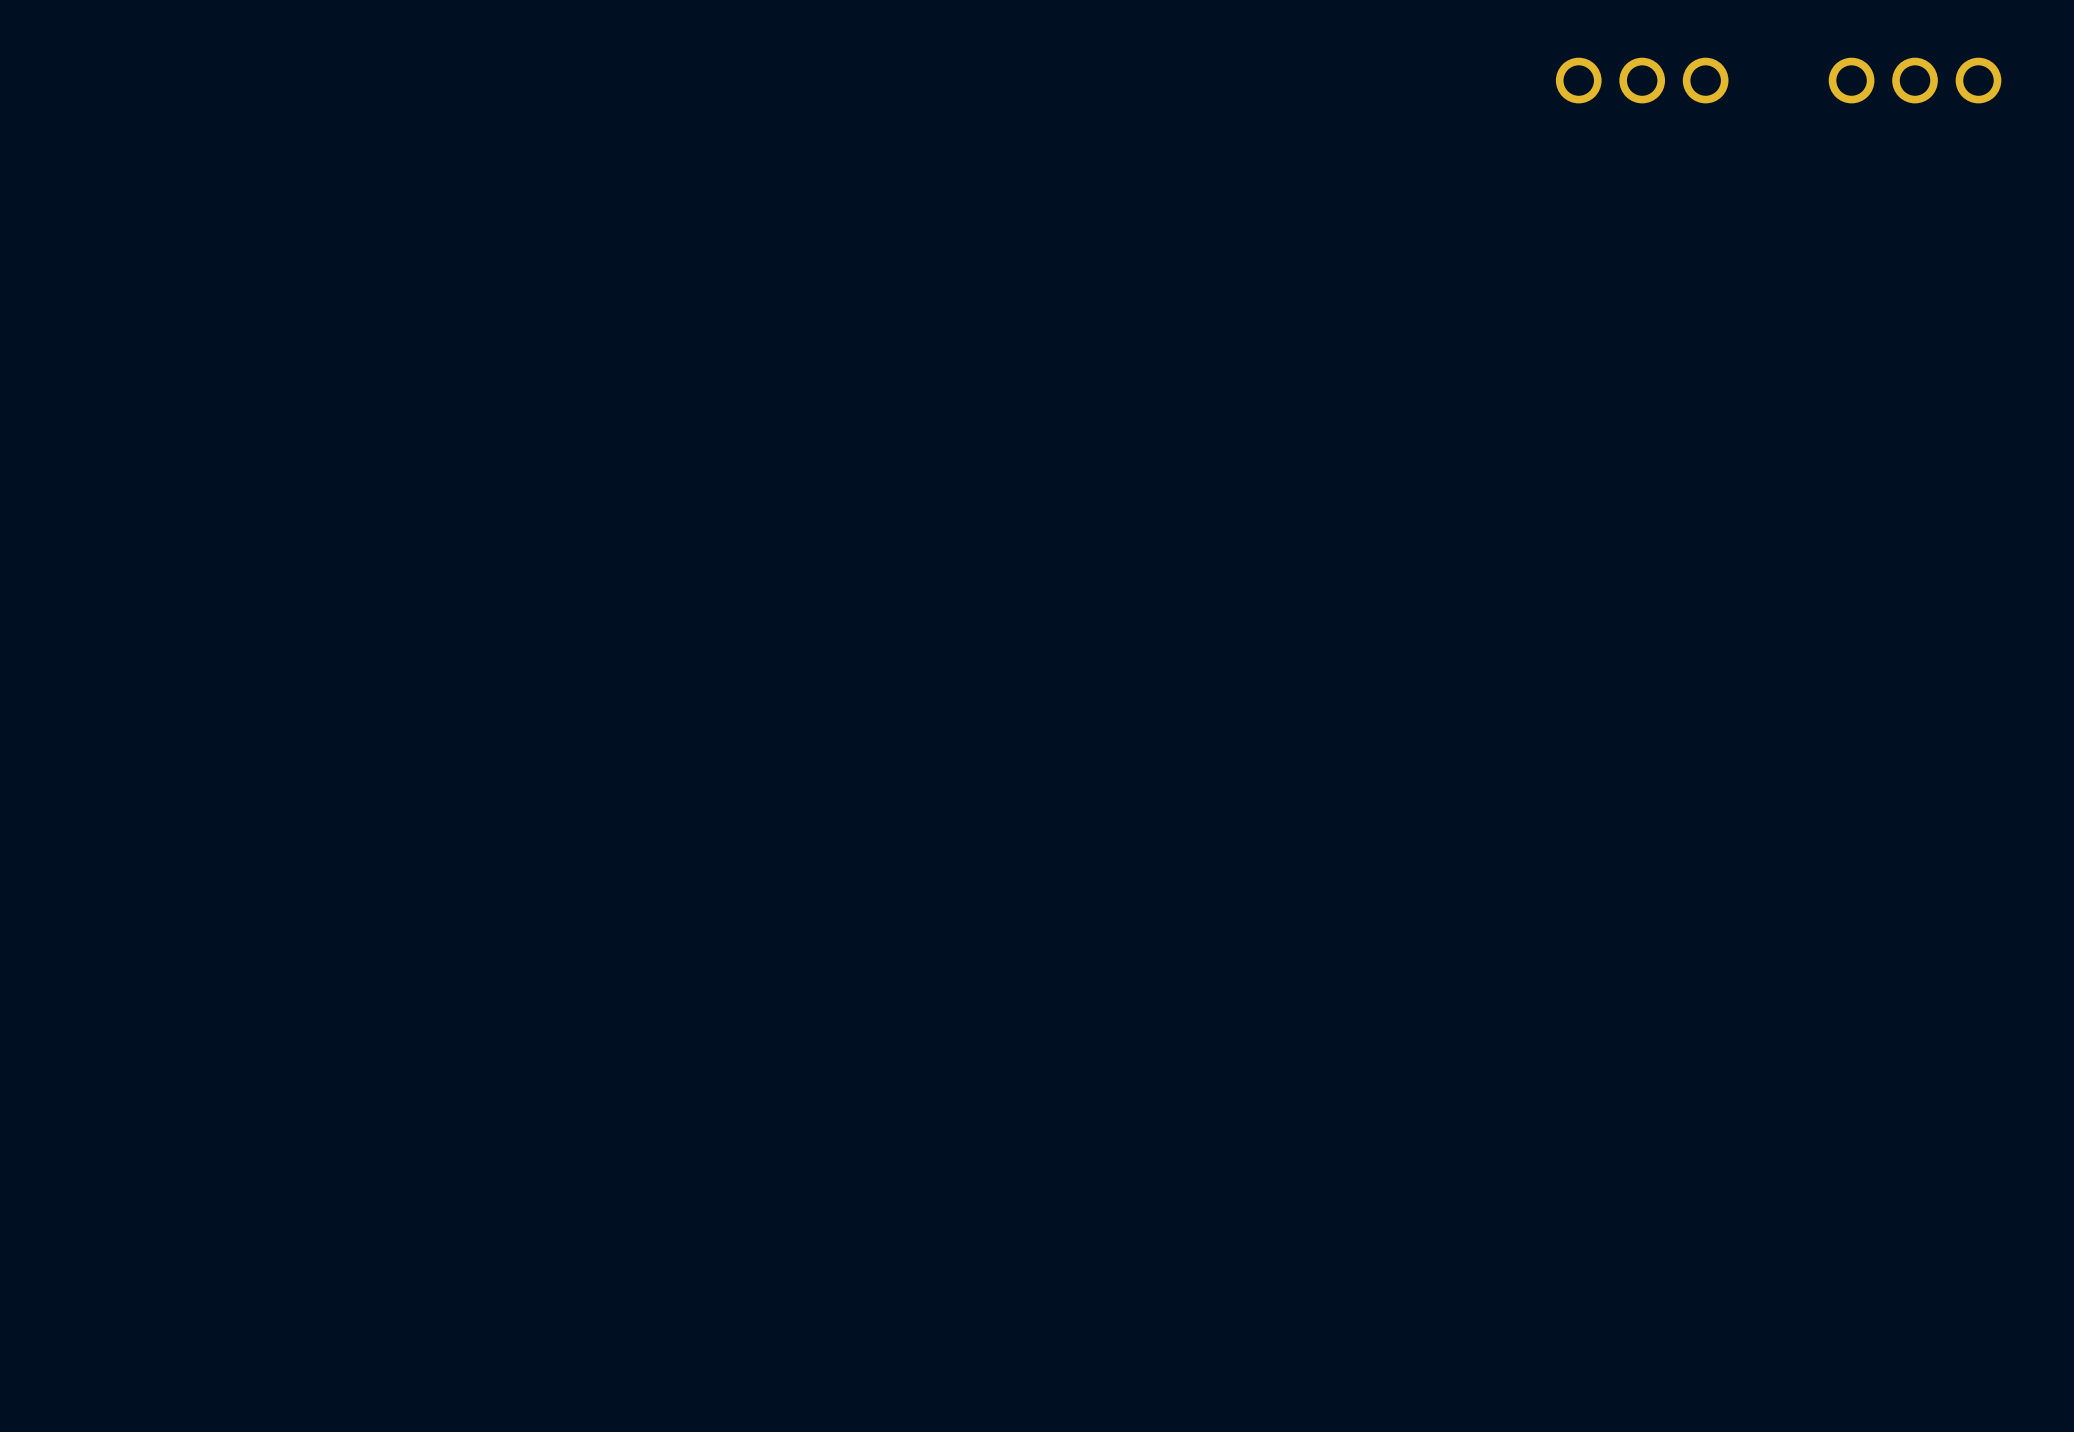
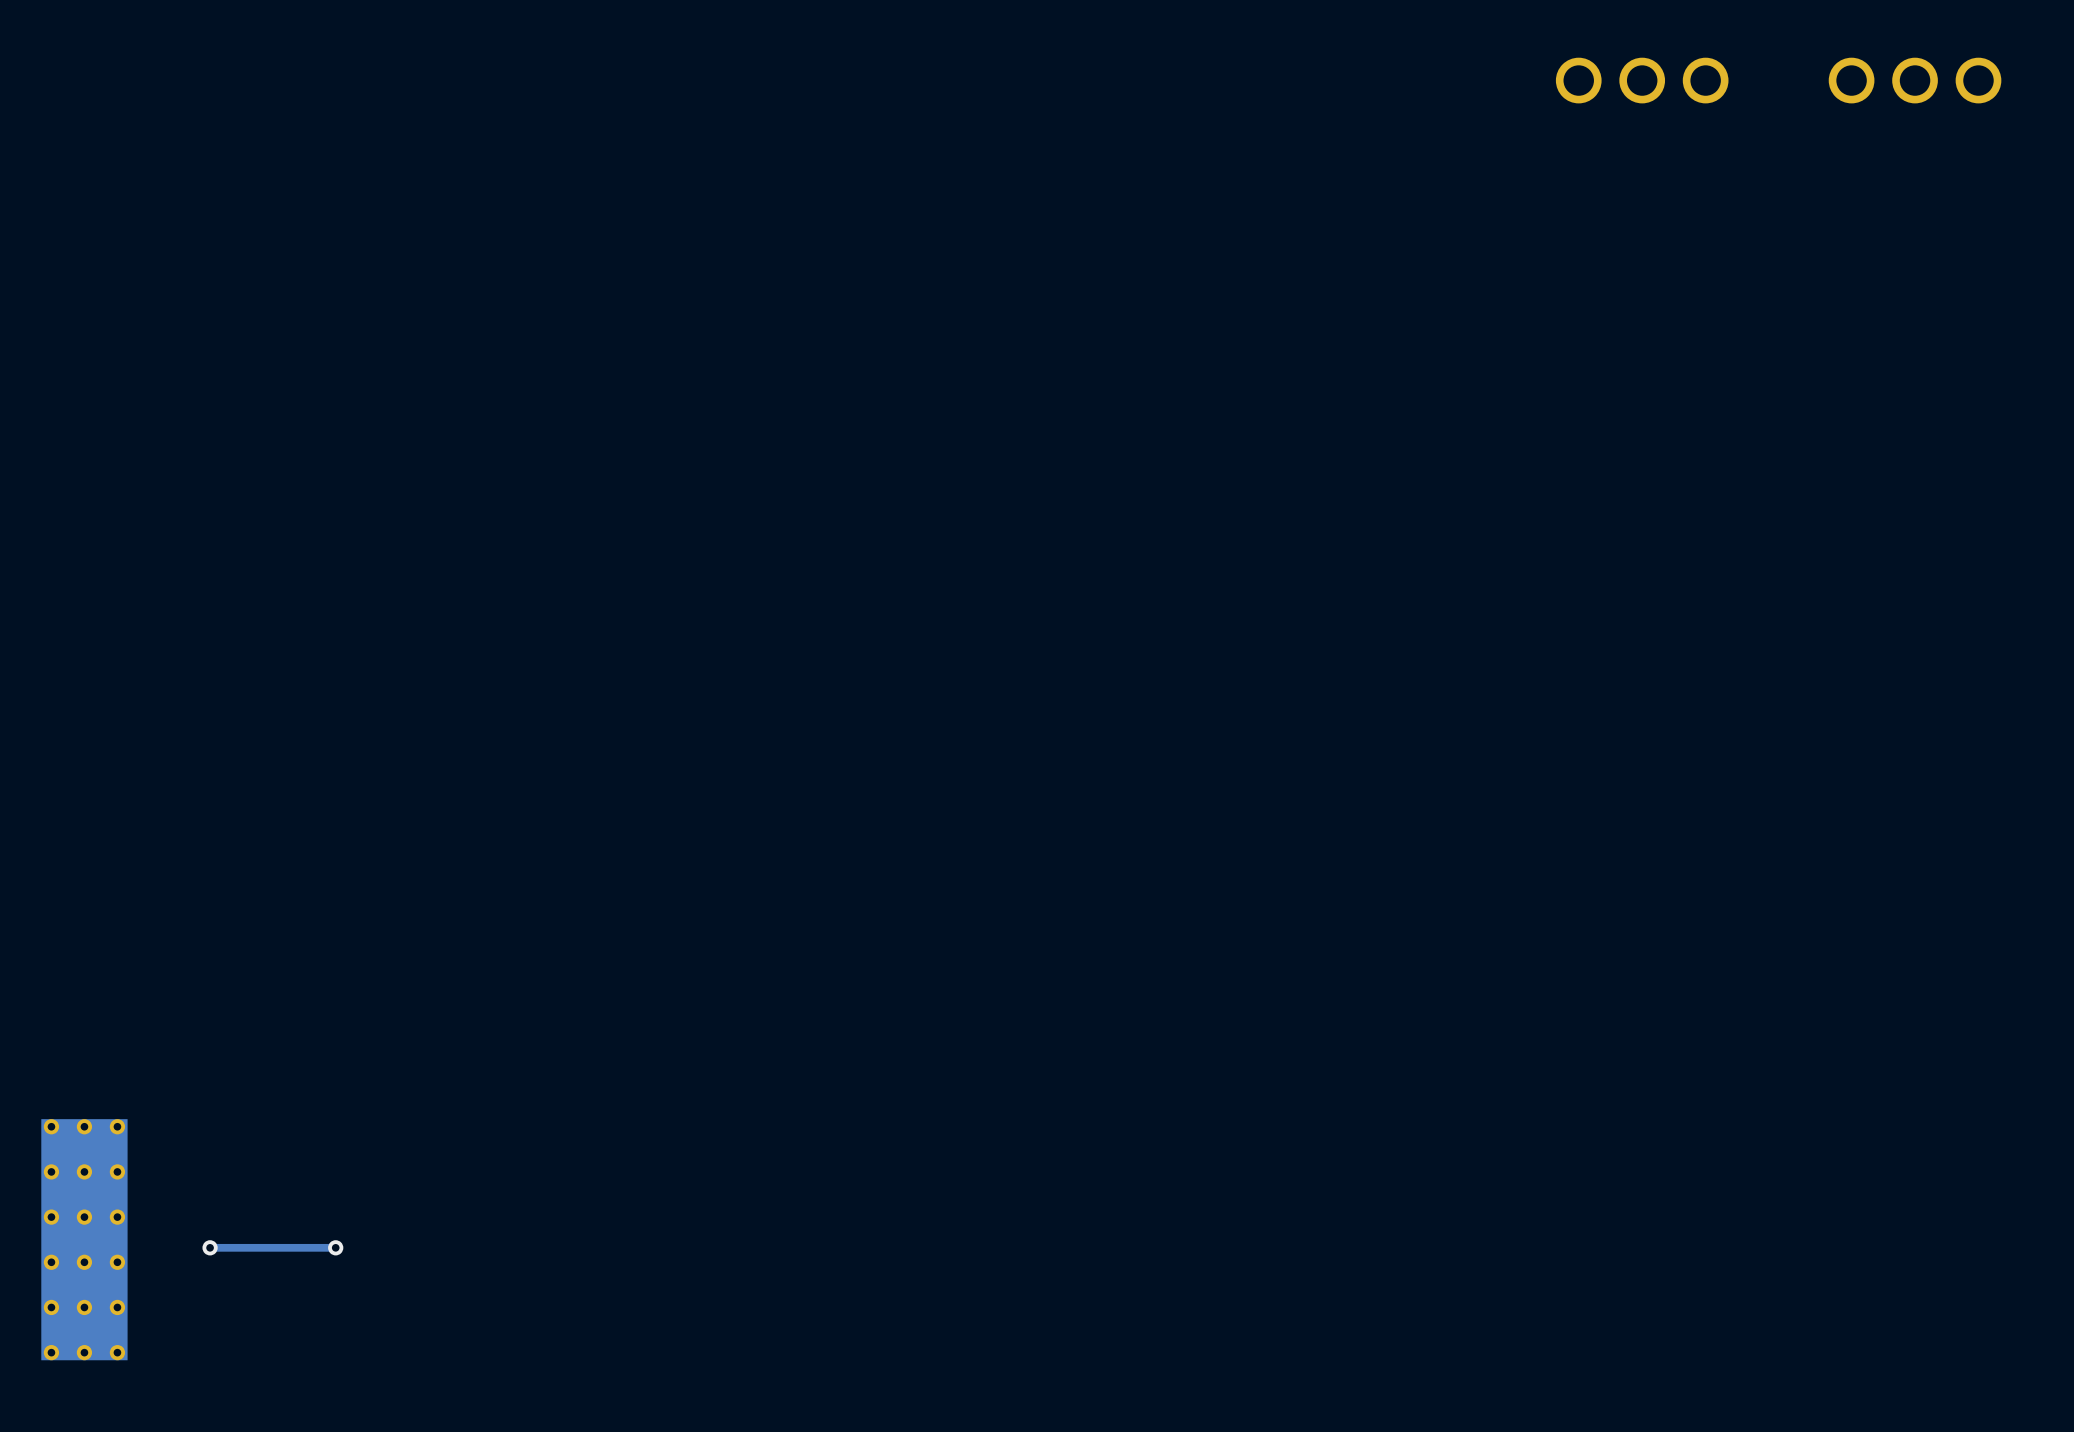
part: none -> (84, 1239)
via: none -> (210, 1247)
track: none -> (335, 1247) (210, 1247)
via: none -> (335, 1247)

